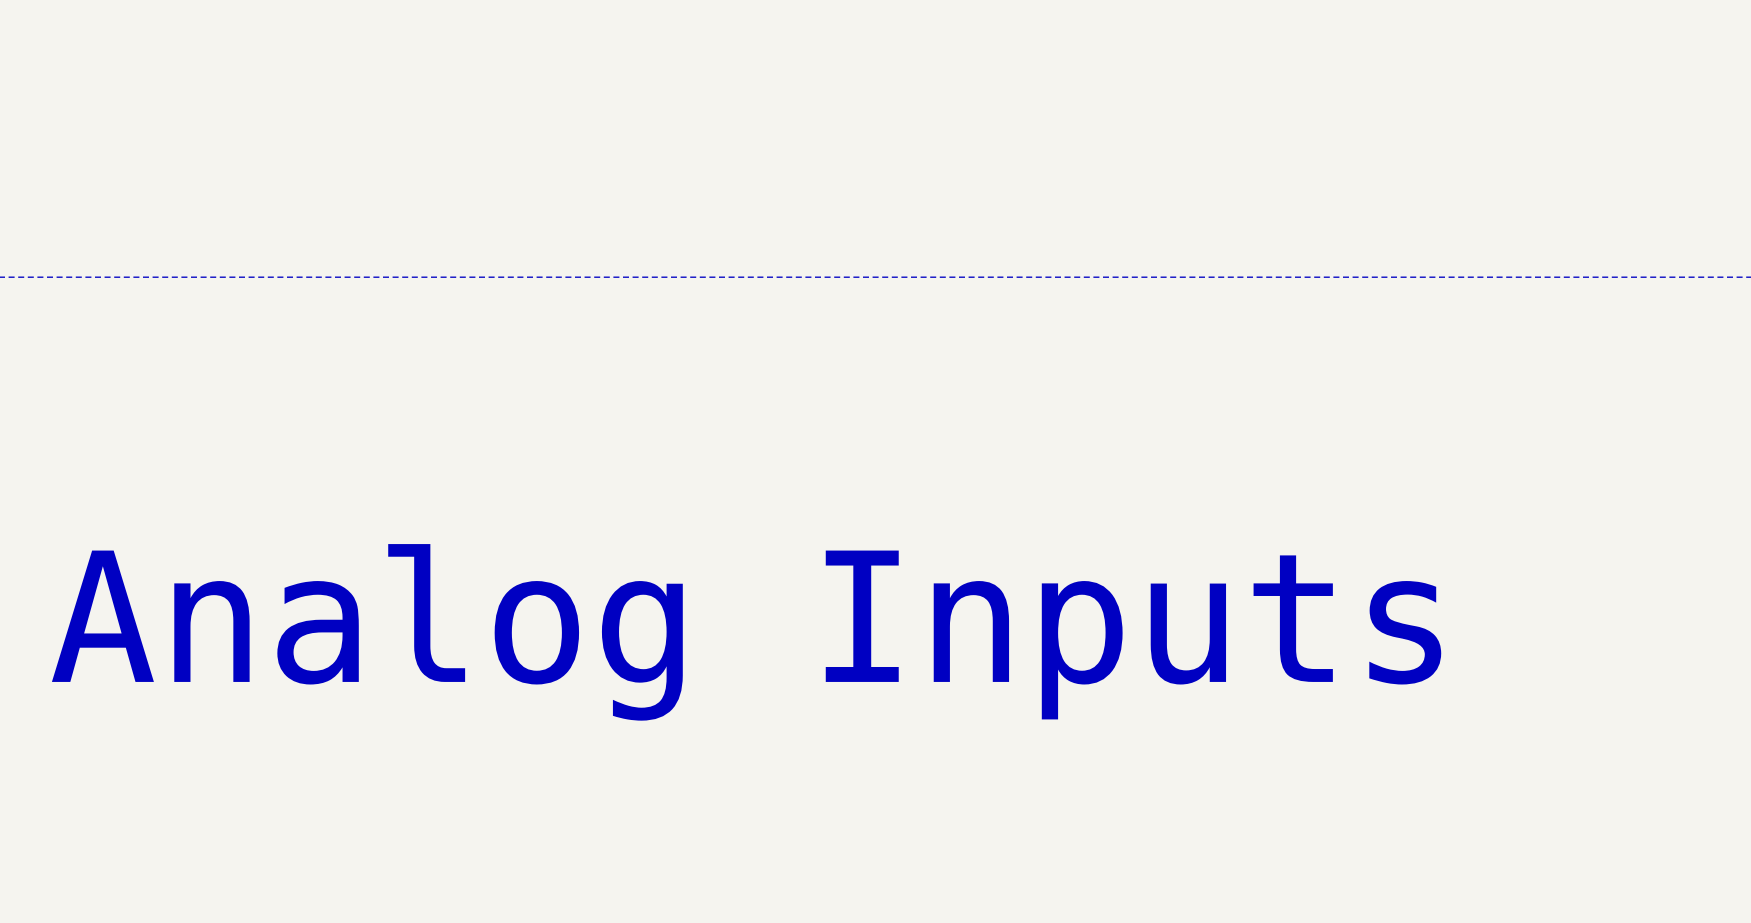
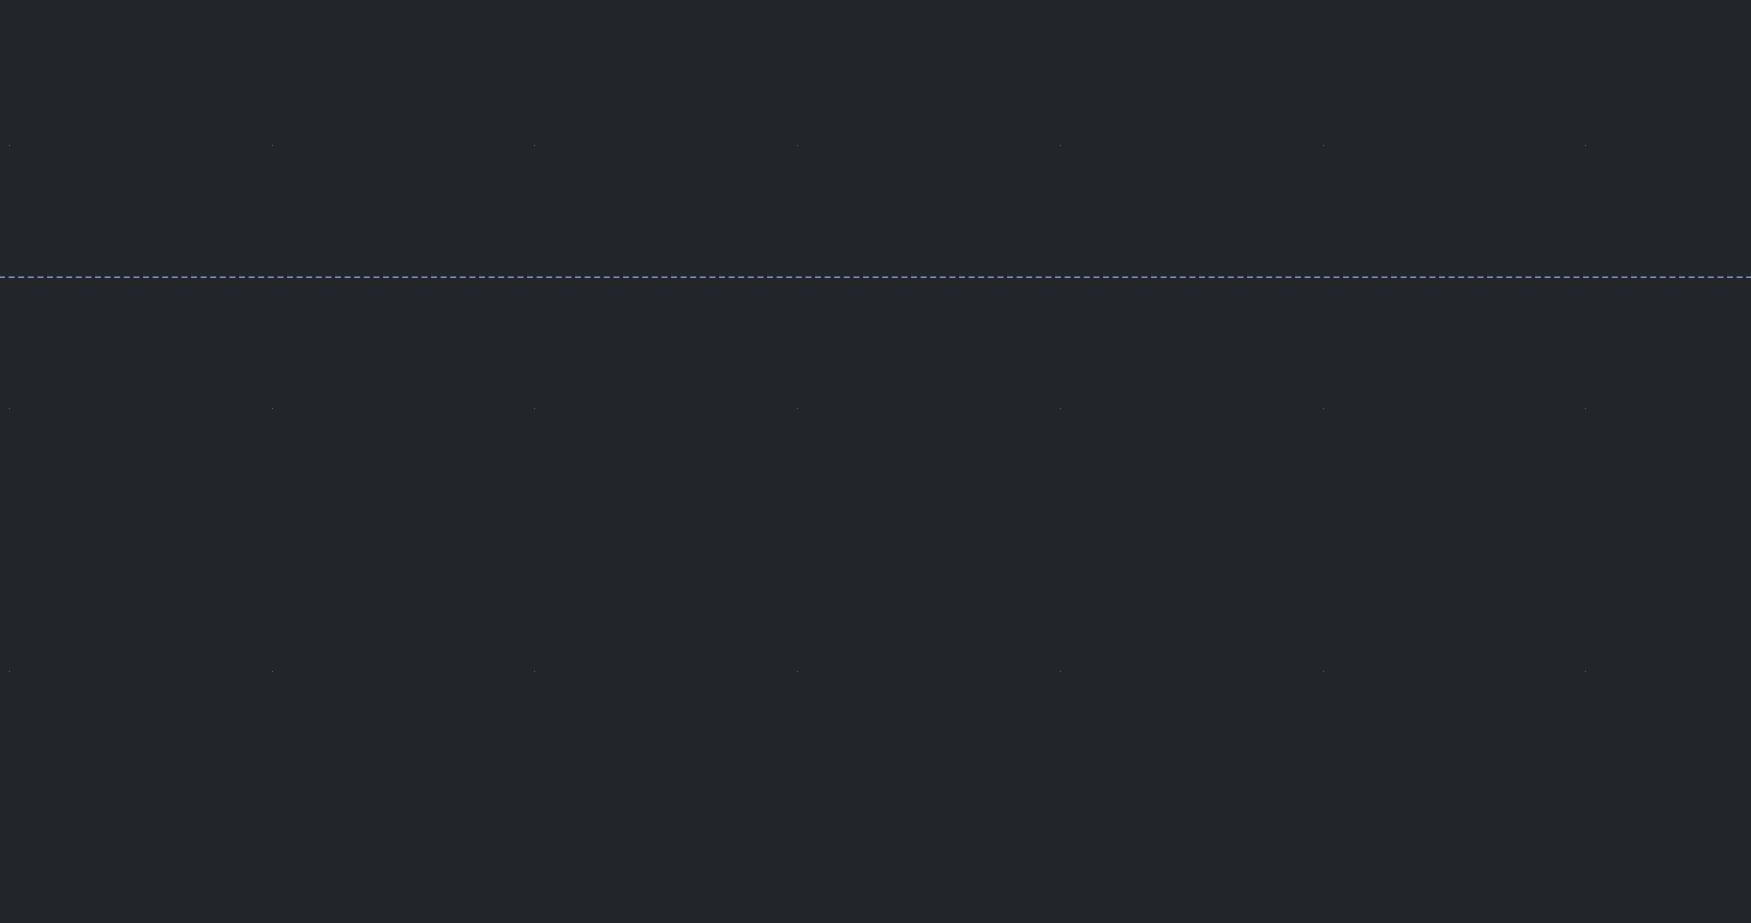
text: Analog Inputs (746, 632) -> none

